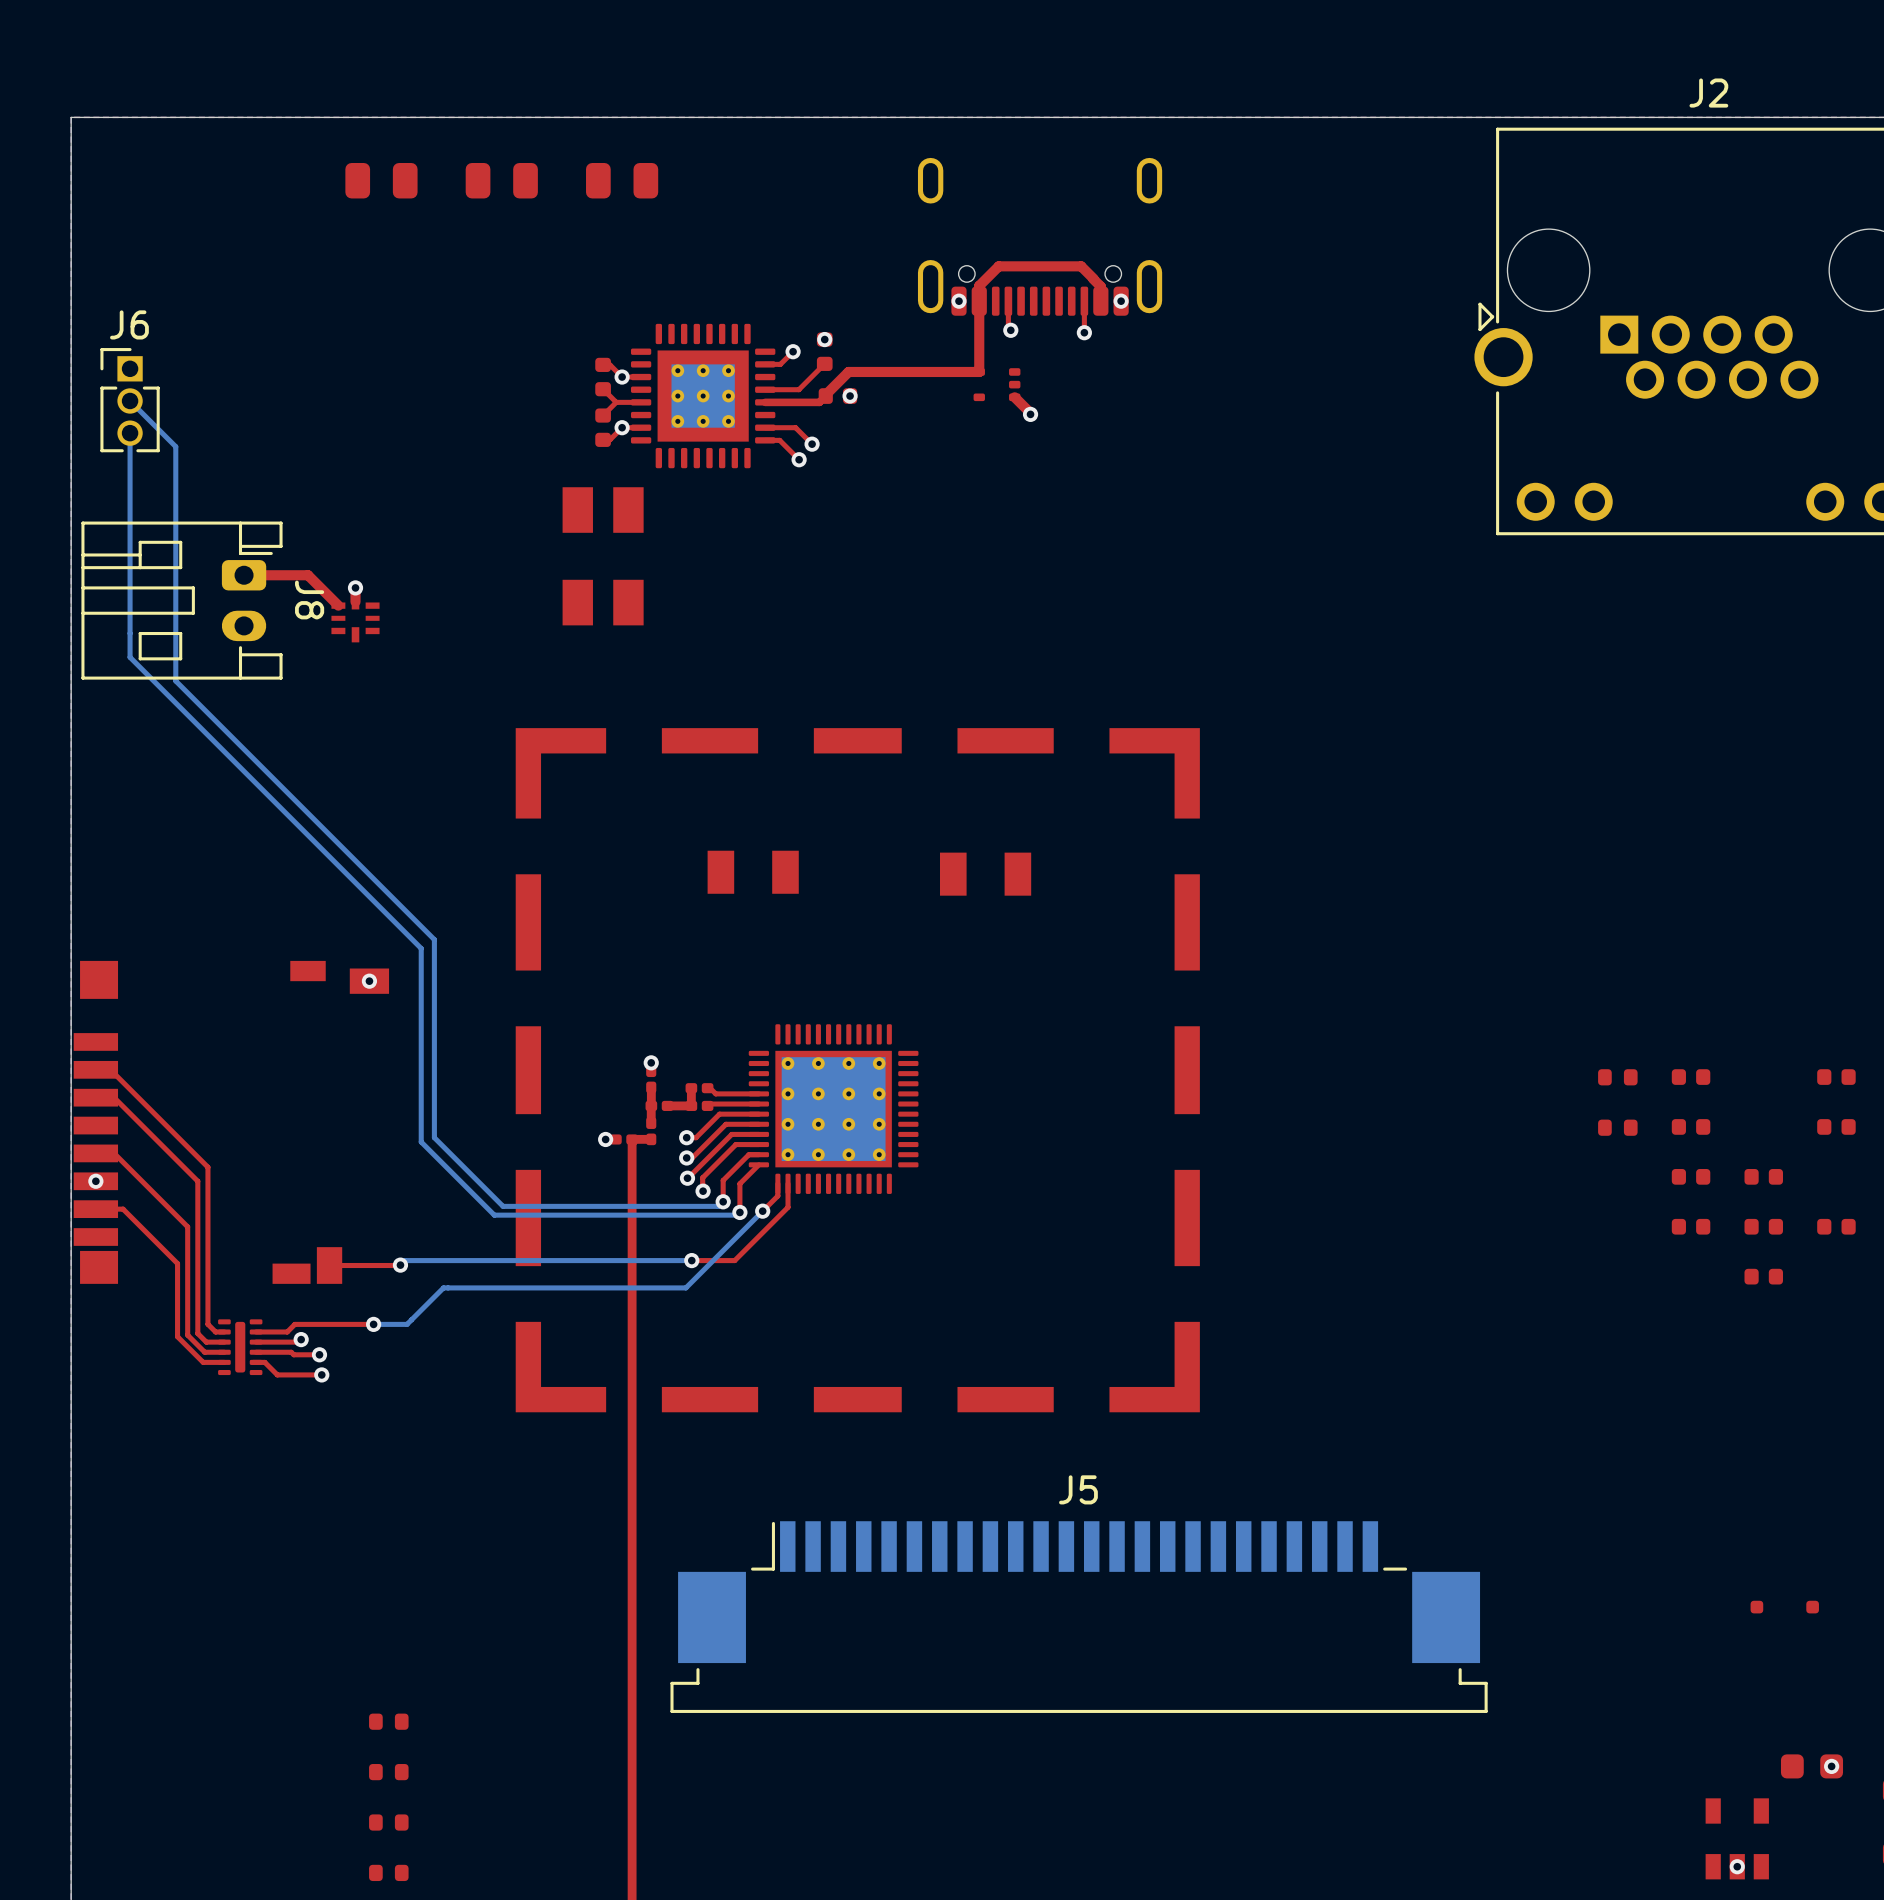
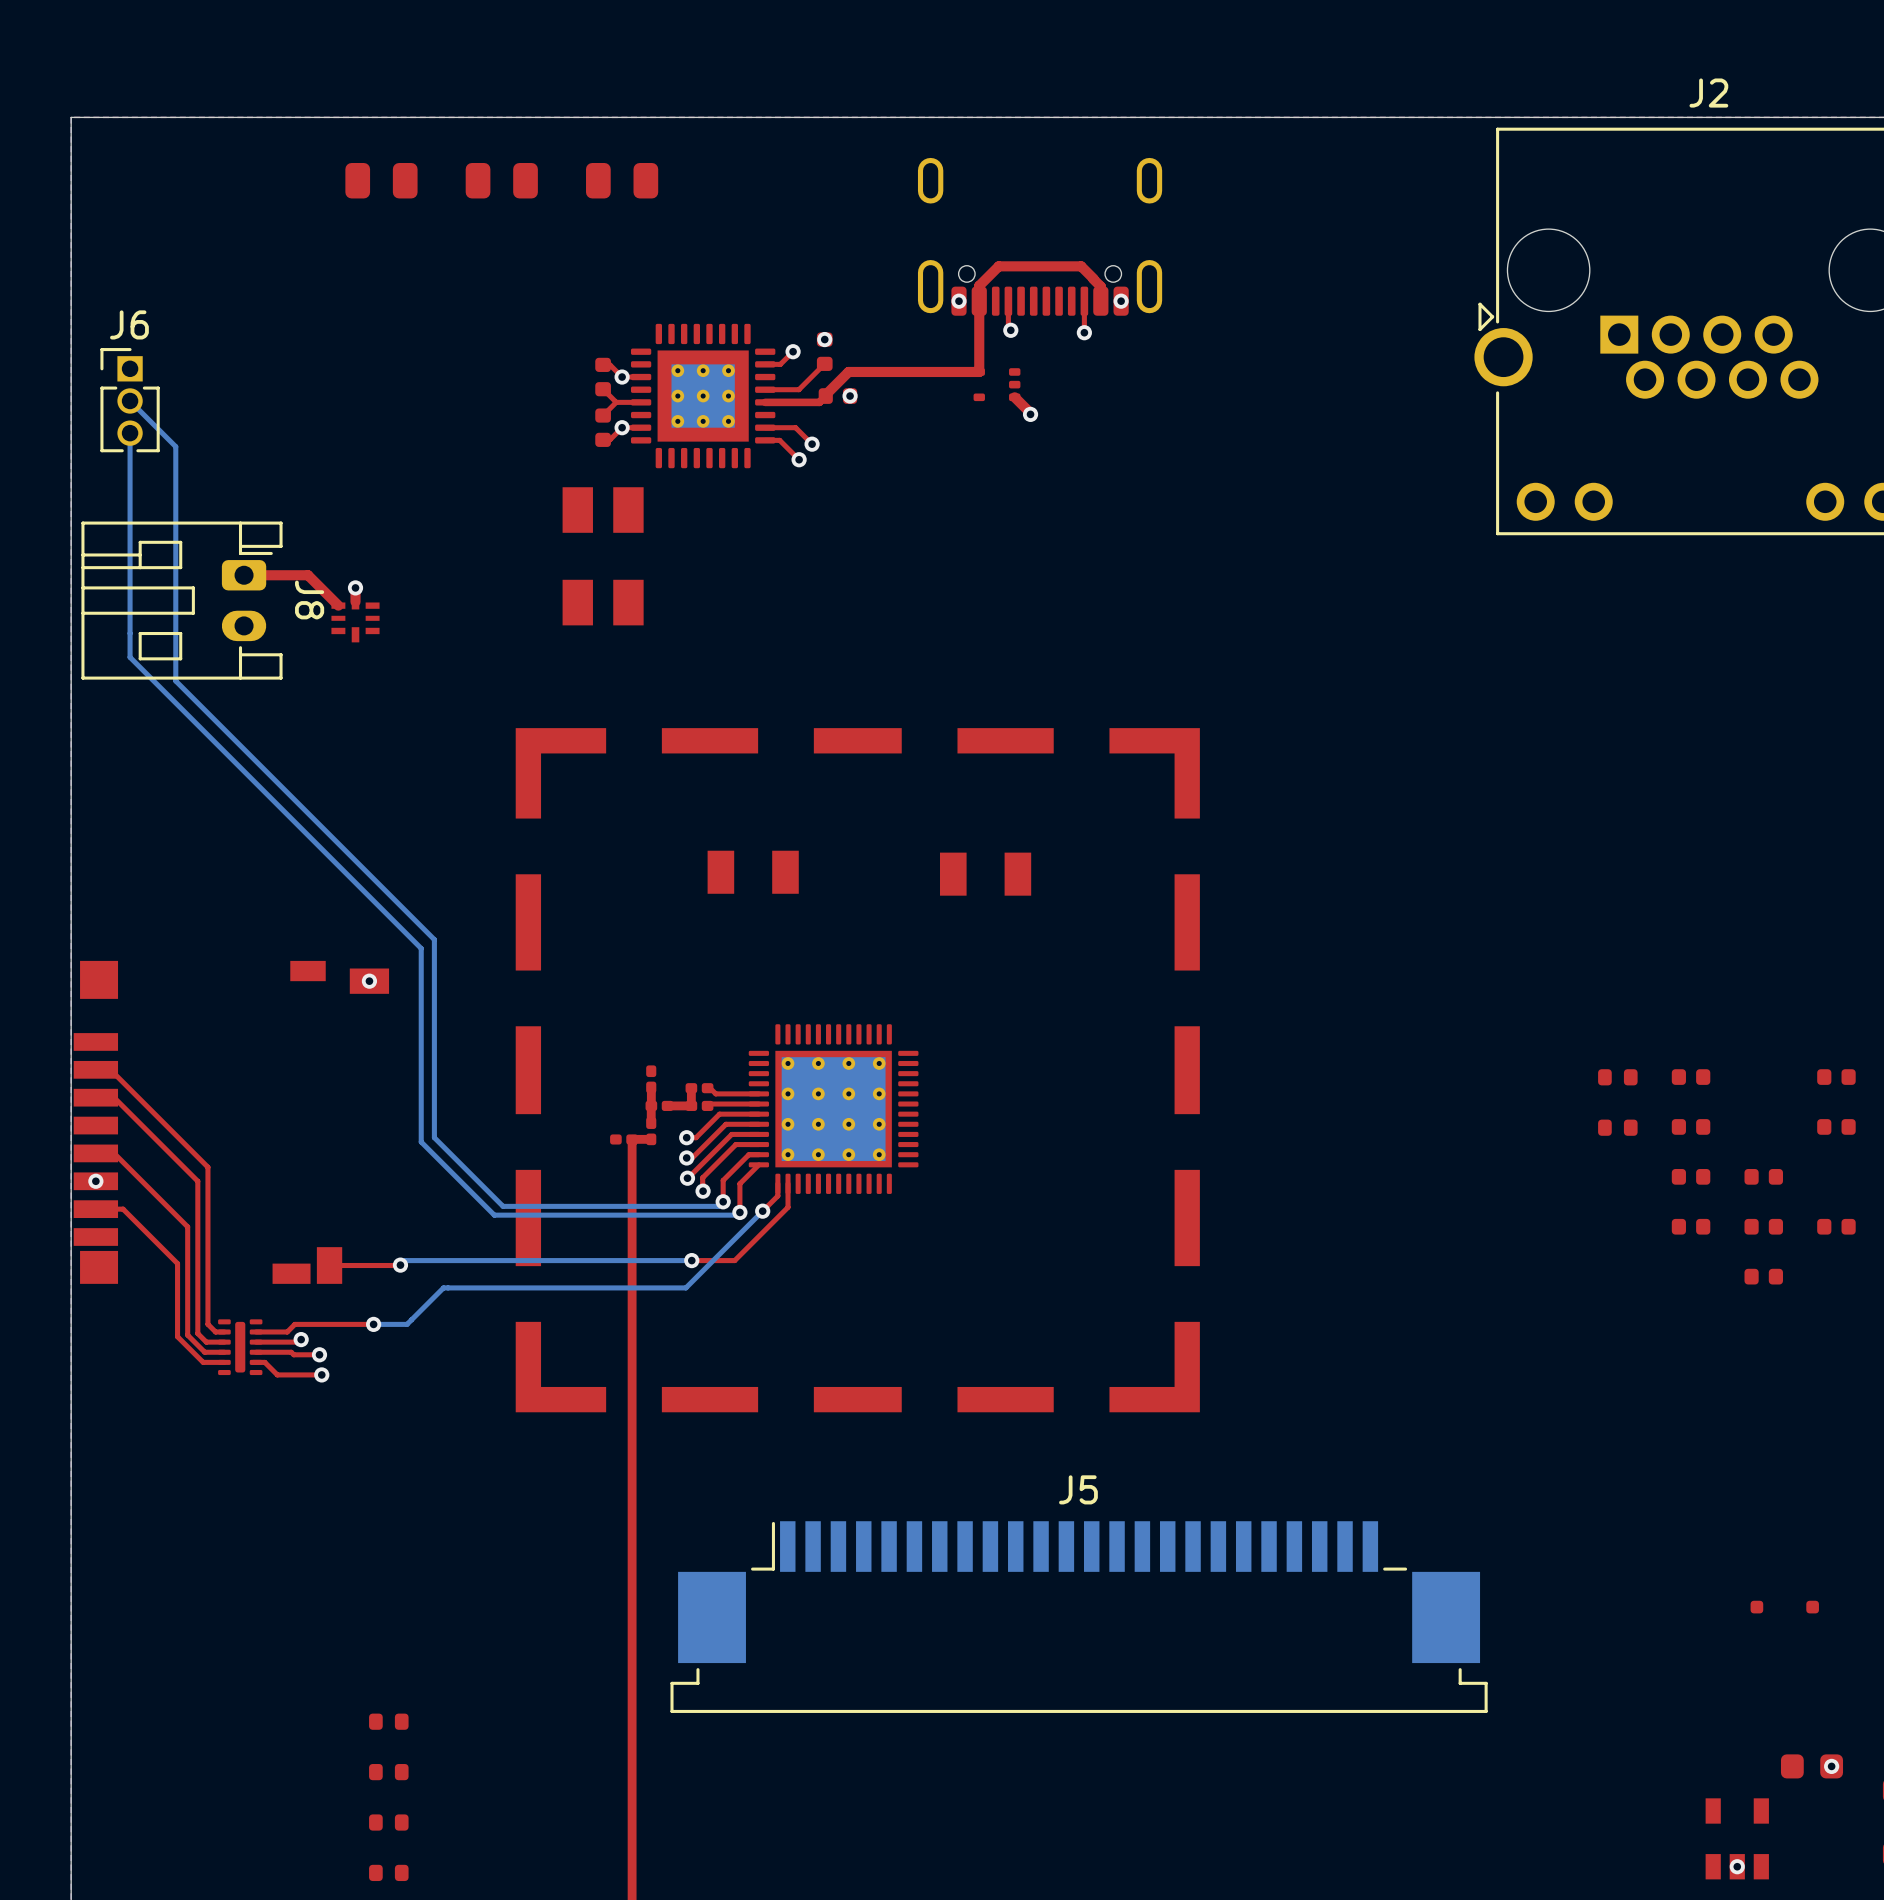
via: (651, 1062) -> none
via: (605, 1139) -> none

